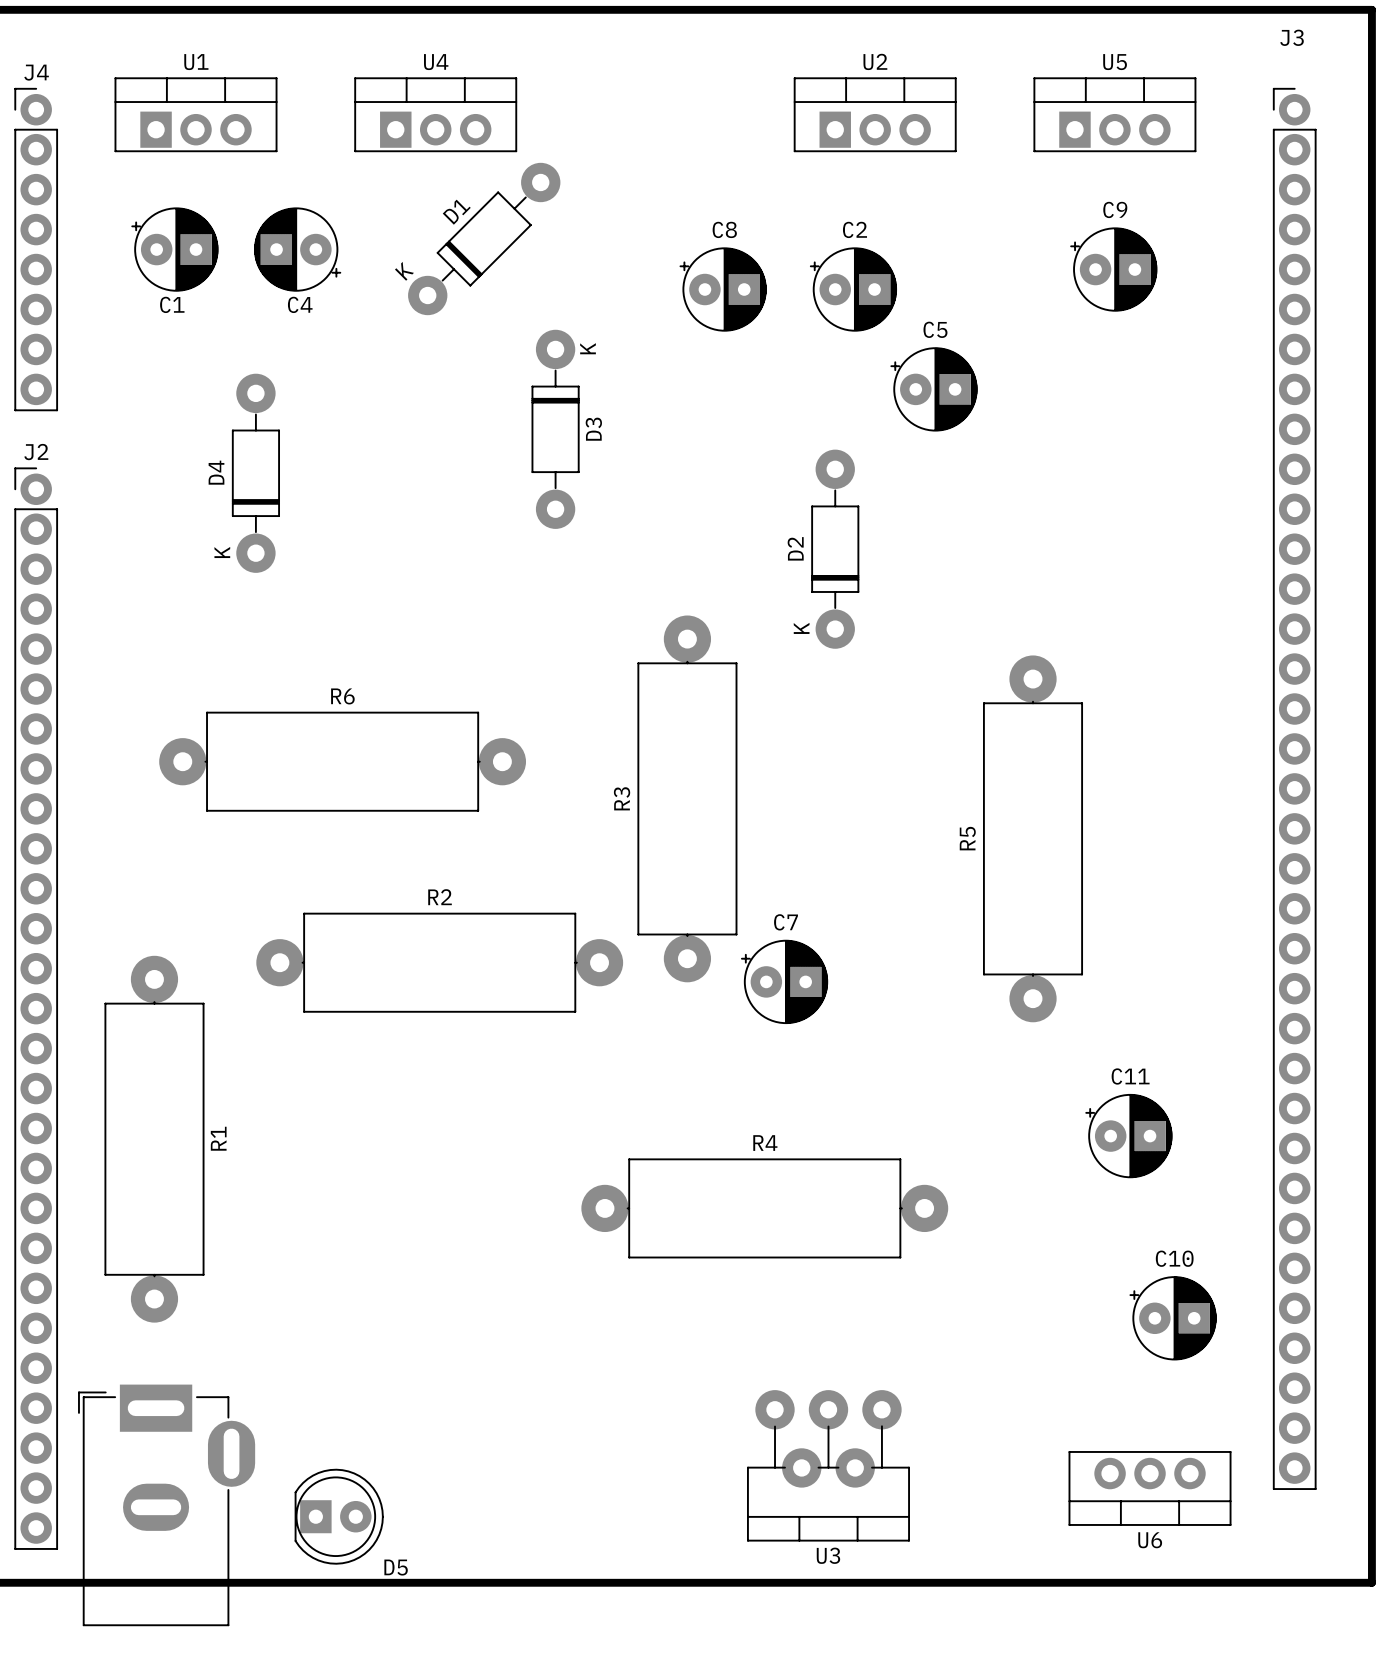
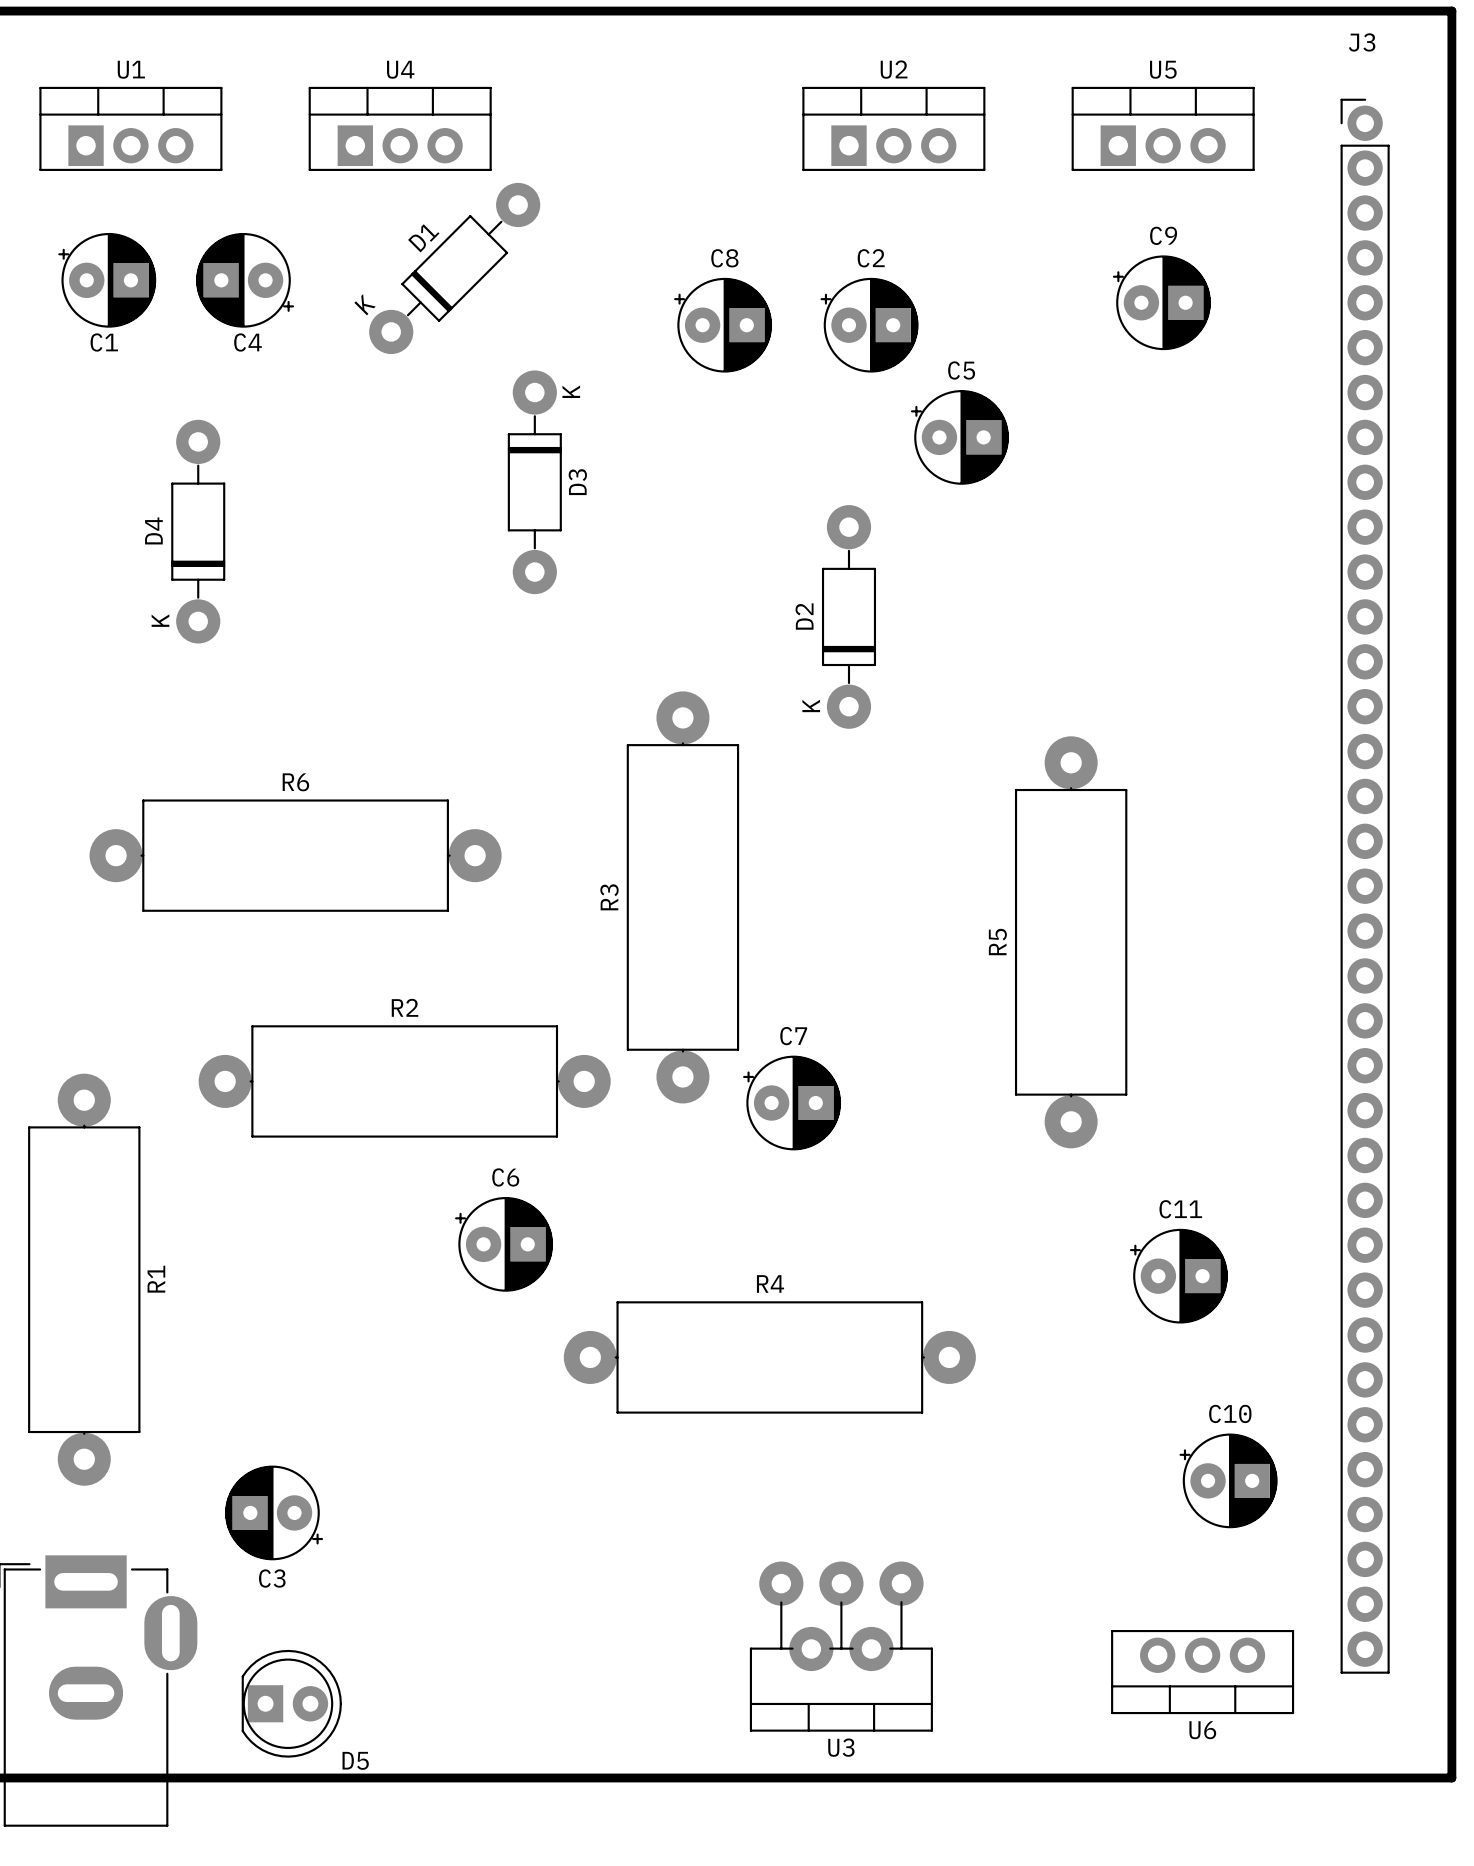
C6: none -> (504, 1244)
C3: none -> (274, 1512)

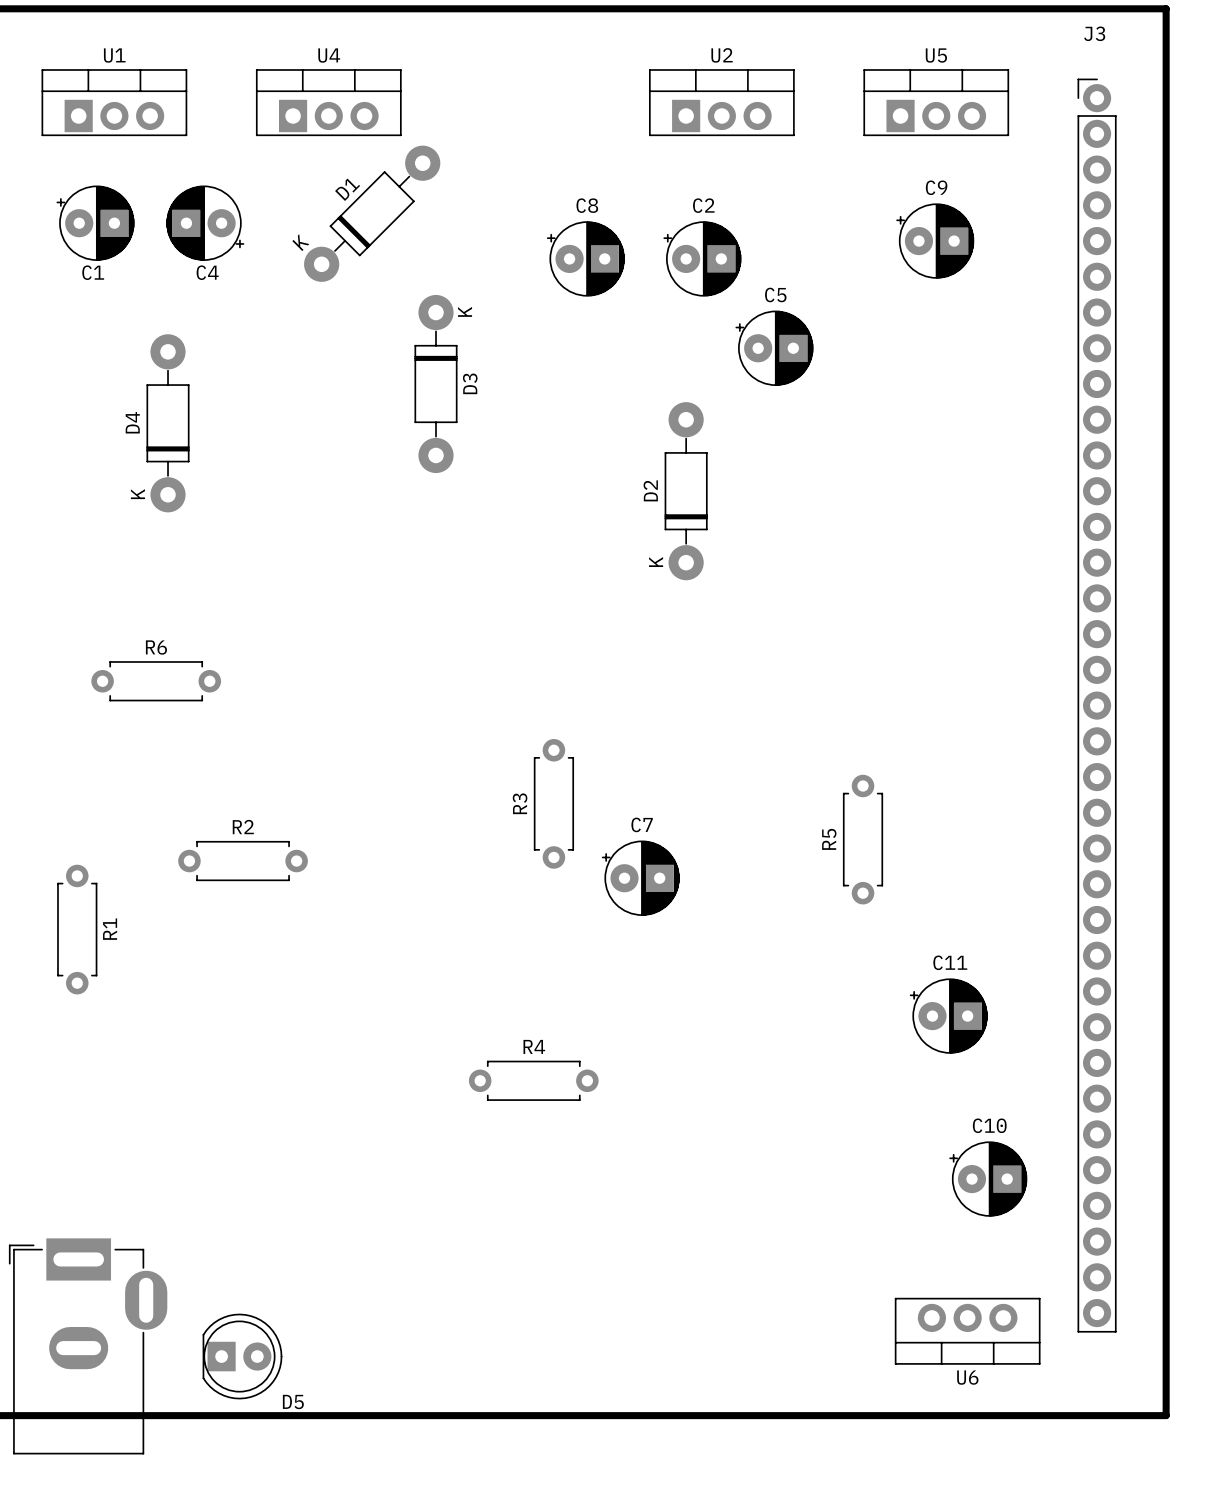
R3 footprint: [626, 691, 740, 1104] -> [533, 739, 575, 869]
R5 footprint: [1014, 736, 1128, 1149] -> [842, 774, 884, 905]
R6 footprint: [89, 799, 502, 912] -> [91, 661, 222, 702]
R2 footprint: [198, 1025, 611, 1138] -> [178, 840, 308, 882]
R1 footprint: [28, 1073, 141, 1486] -> [57, 864, 98, 995]
C6: (504, 1244) -> none
R4 footprint: [563, 1301, 976, 1414] -> [468, 1060, 599, 1101]
C3: (274, 1512) -> none
U3: (841, 1646) -> none

